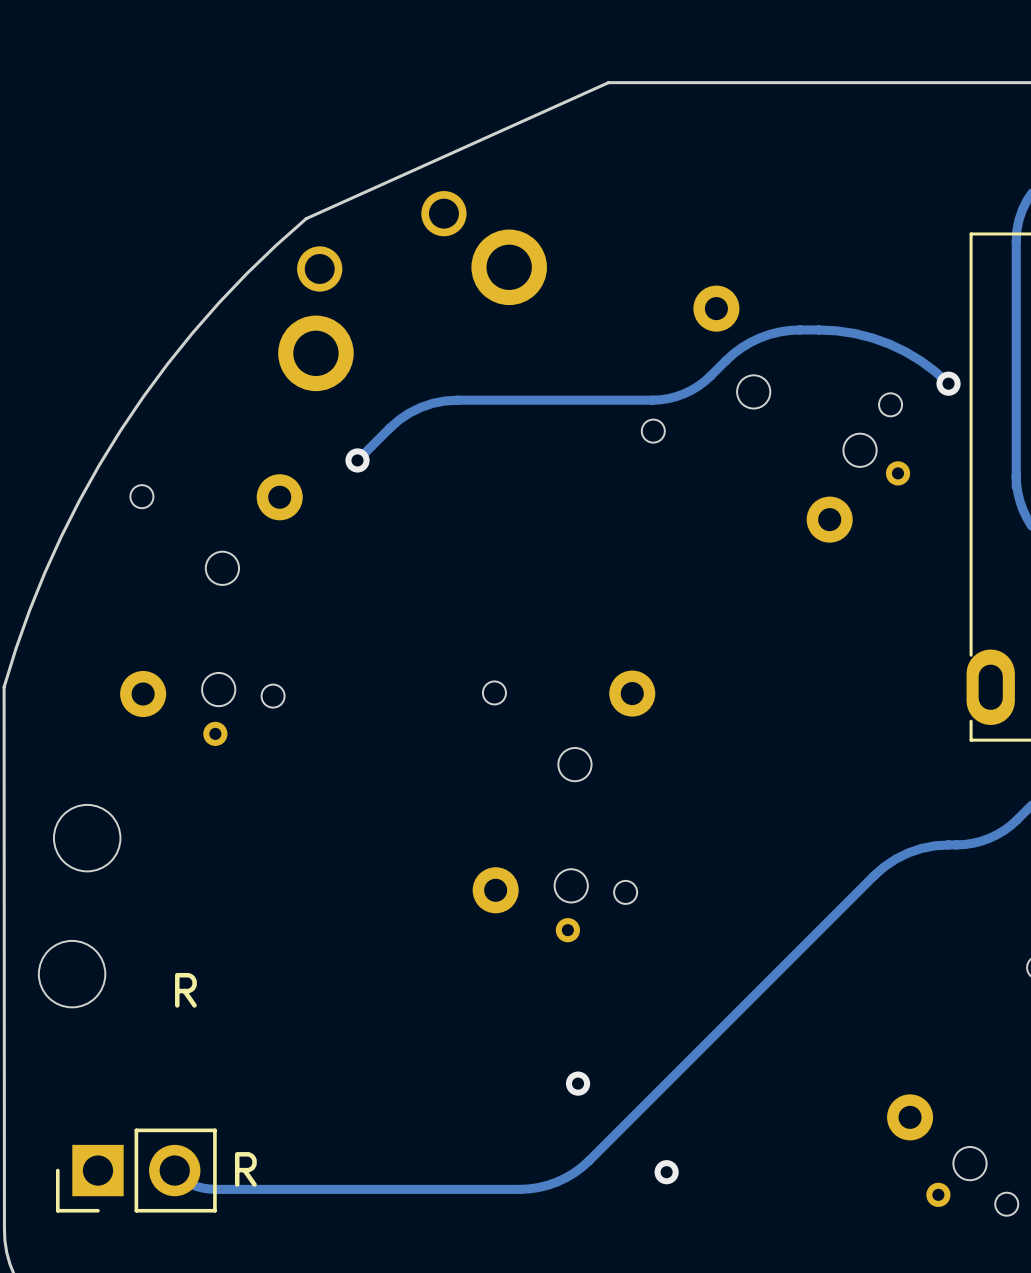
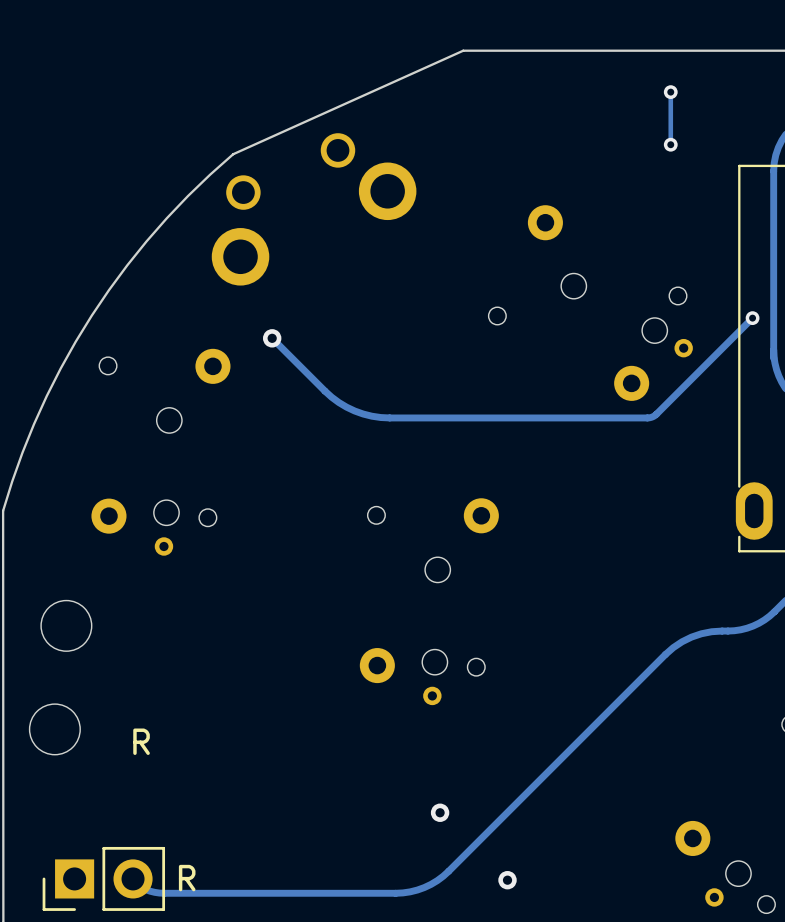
track: none -> (670, 92) (670, 144)
via: none -> (670, 92)
via: none -> (670, 144)
track: (948, 383) (935, 371) (905, 351) (872, 337) (836, 330) (789, 330) (769, 334) (750, 342) (733, 353) (698, 386) (683, 393) (668, 398) (457, 400) (432, 403) (420, 407) (399, 419) (357, 460) -> (752, 318) (656, 414) (647, 417) (389, 417) (371, 416) (346, 407) (331, 397) (272, 338)
via: (948, 383) -> none
via: none -> (752, 318)

